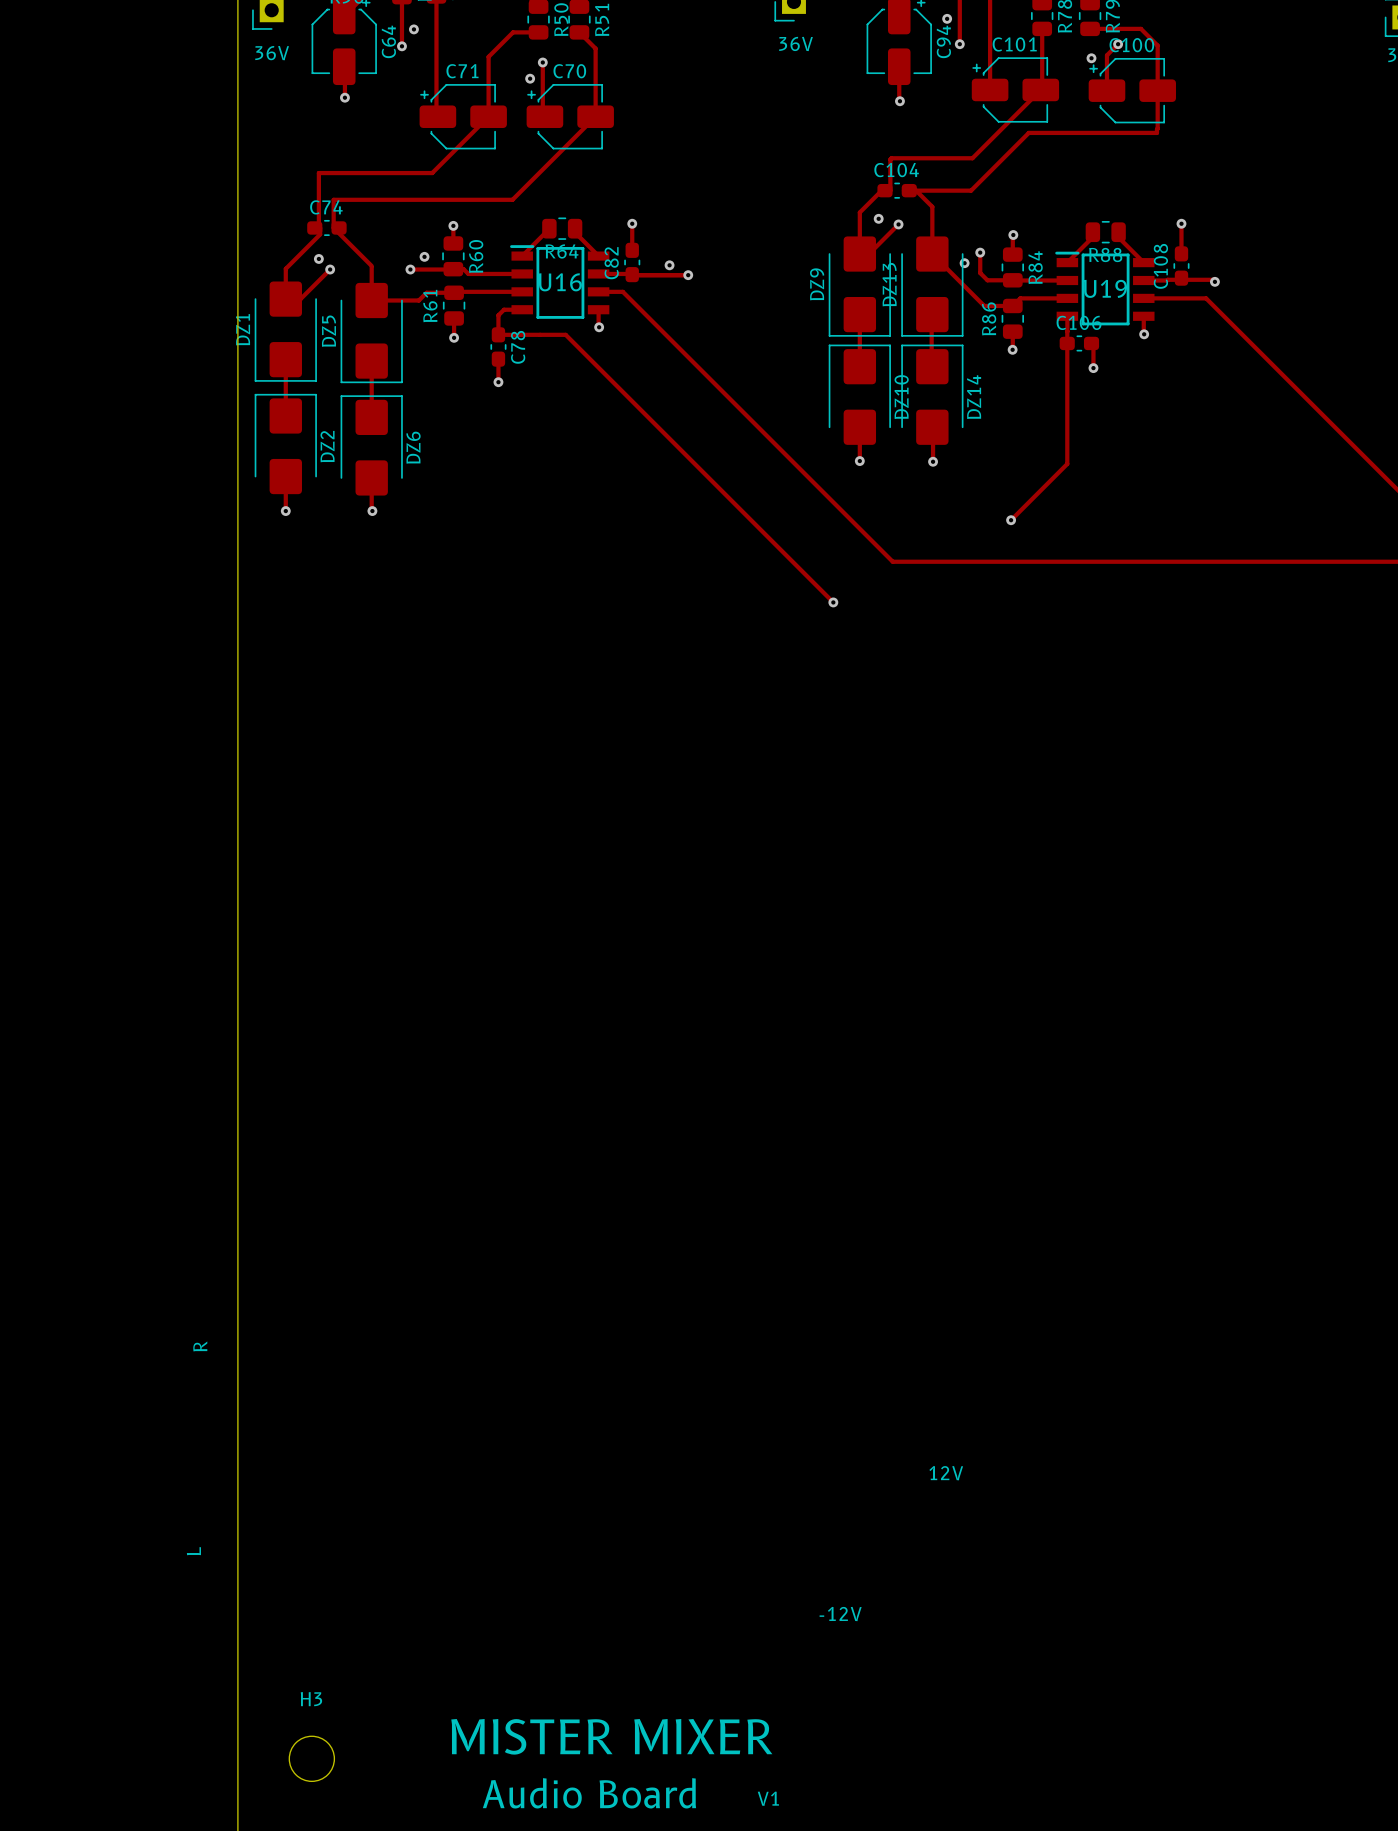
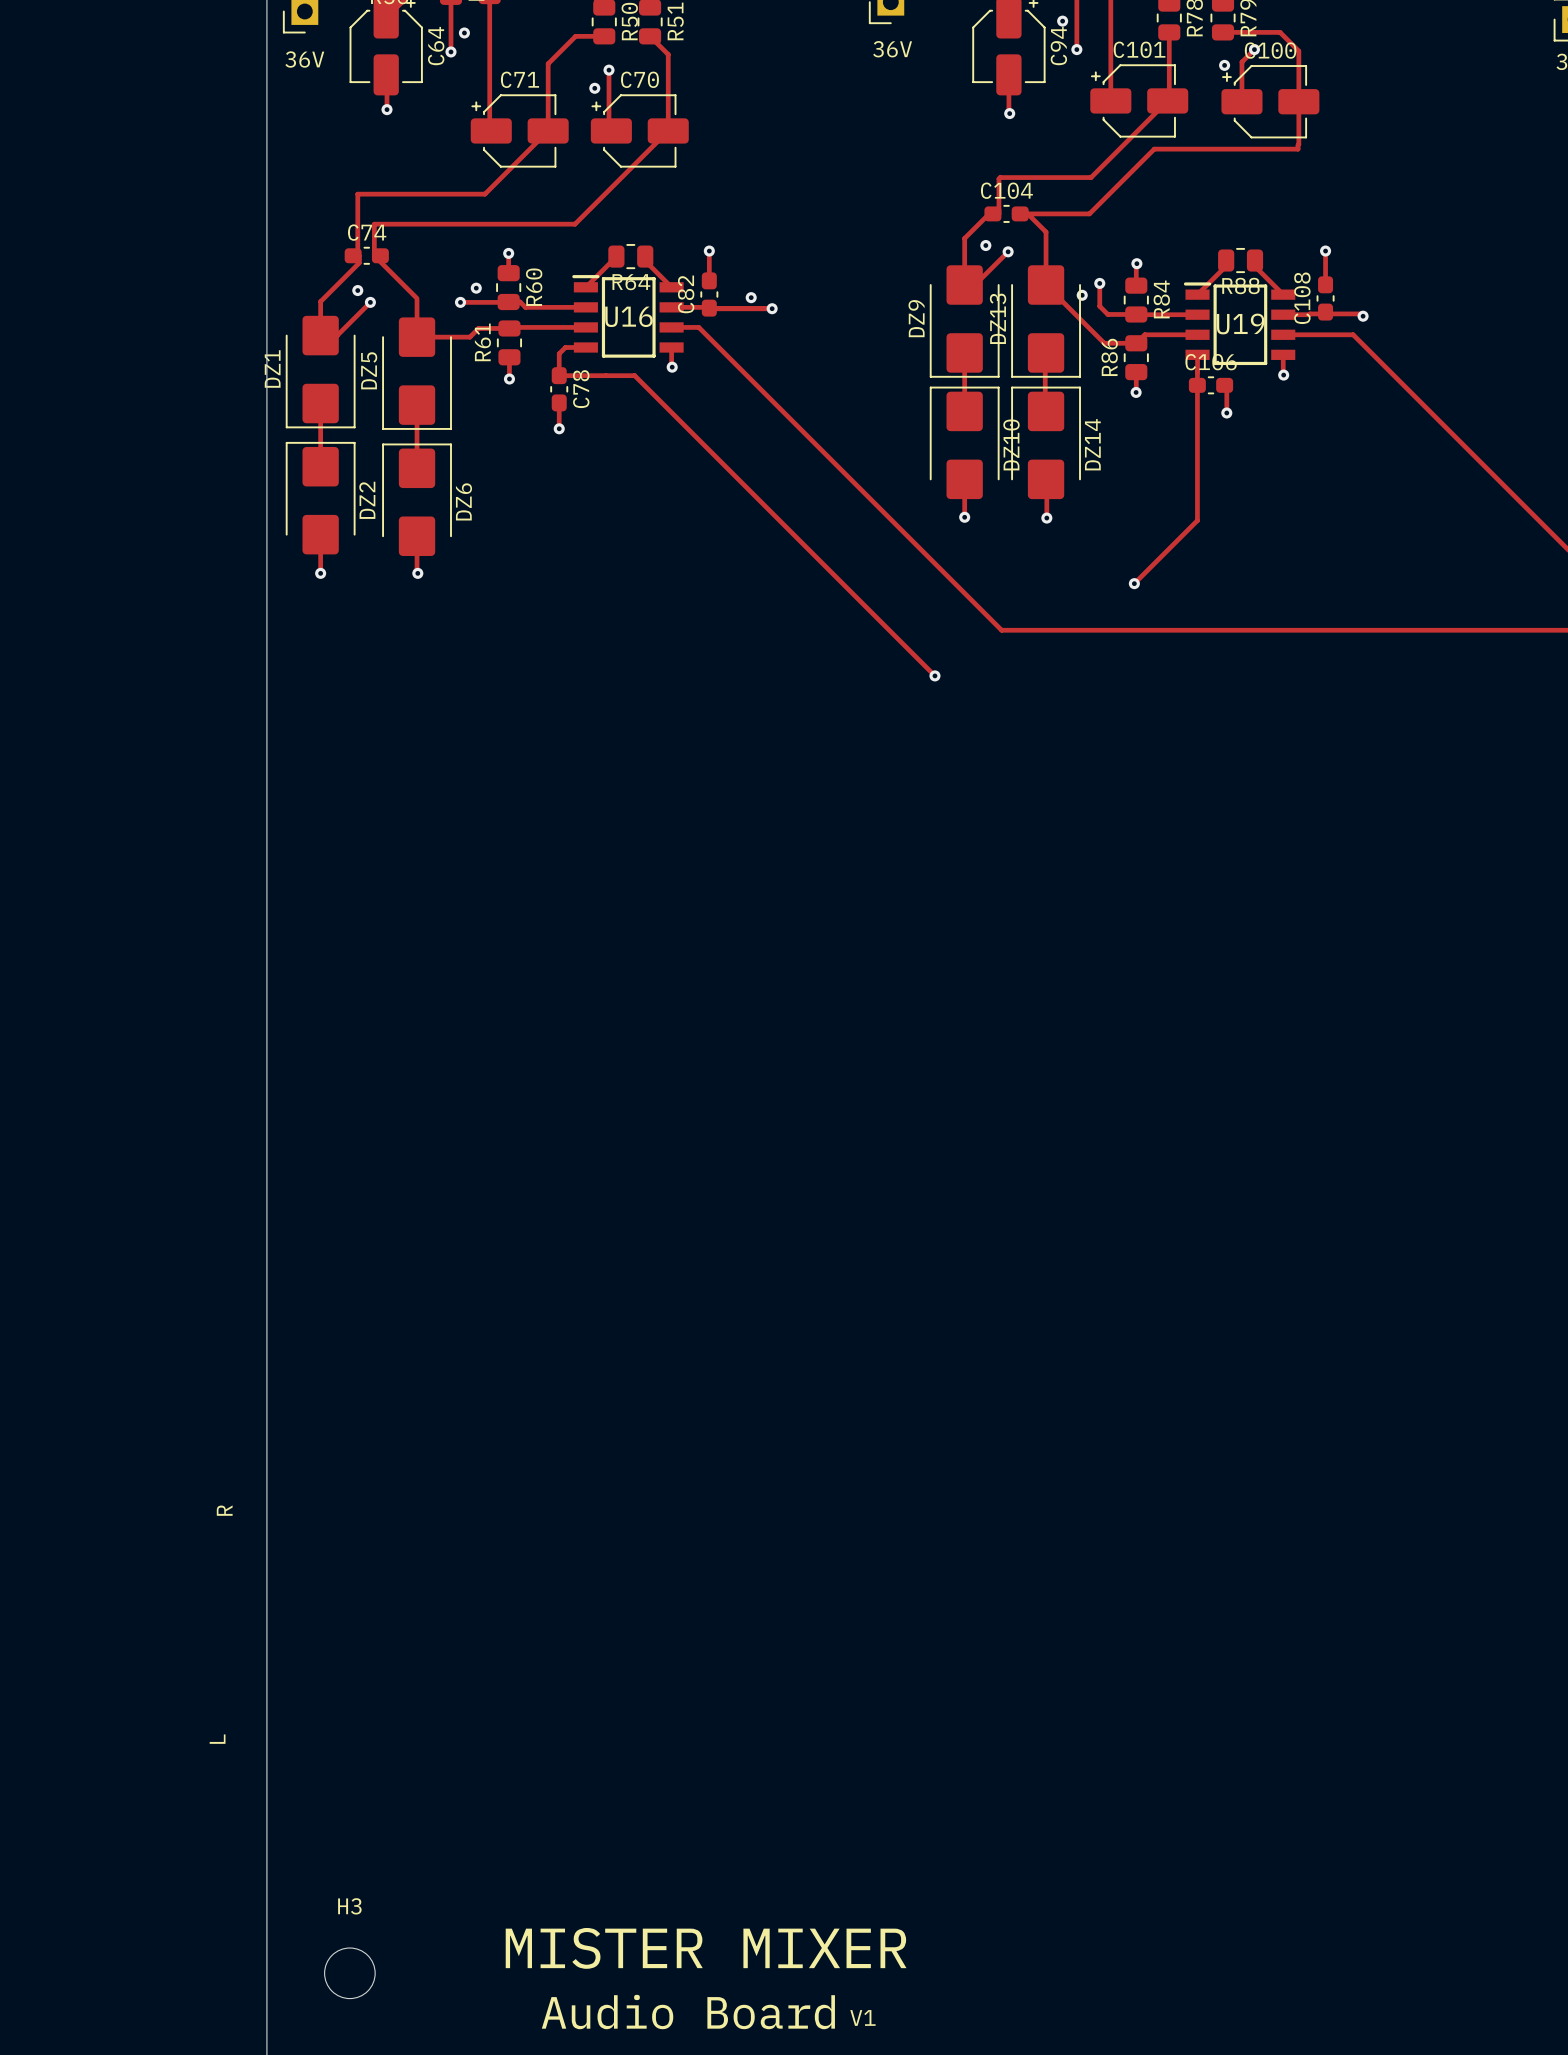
text: 12V (946, 1473) -> none
text: -12V (840, 1614) -> none

